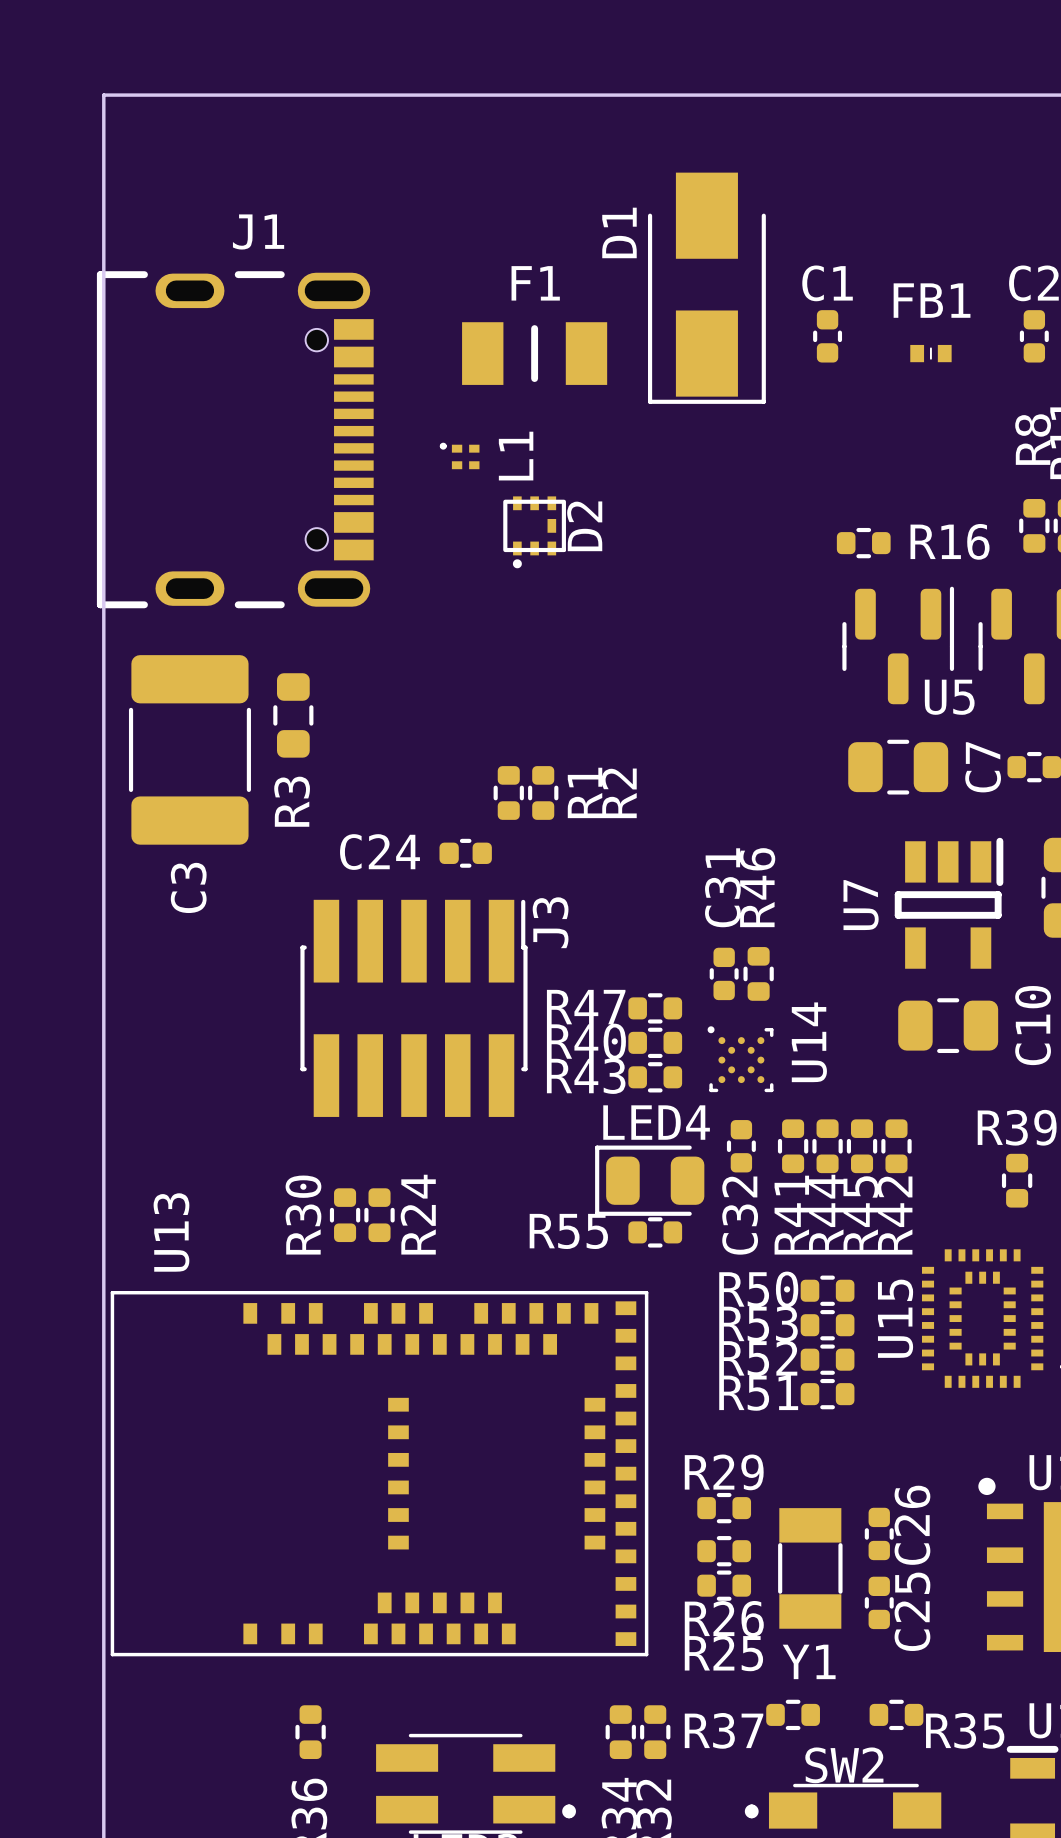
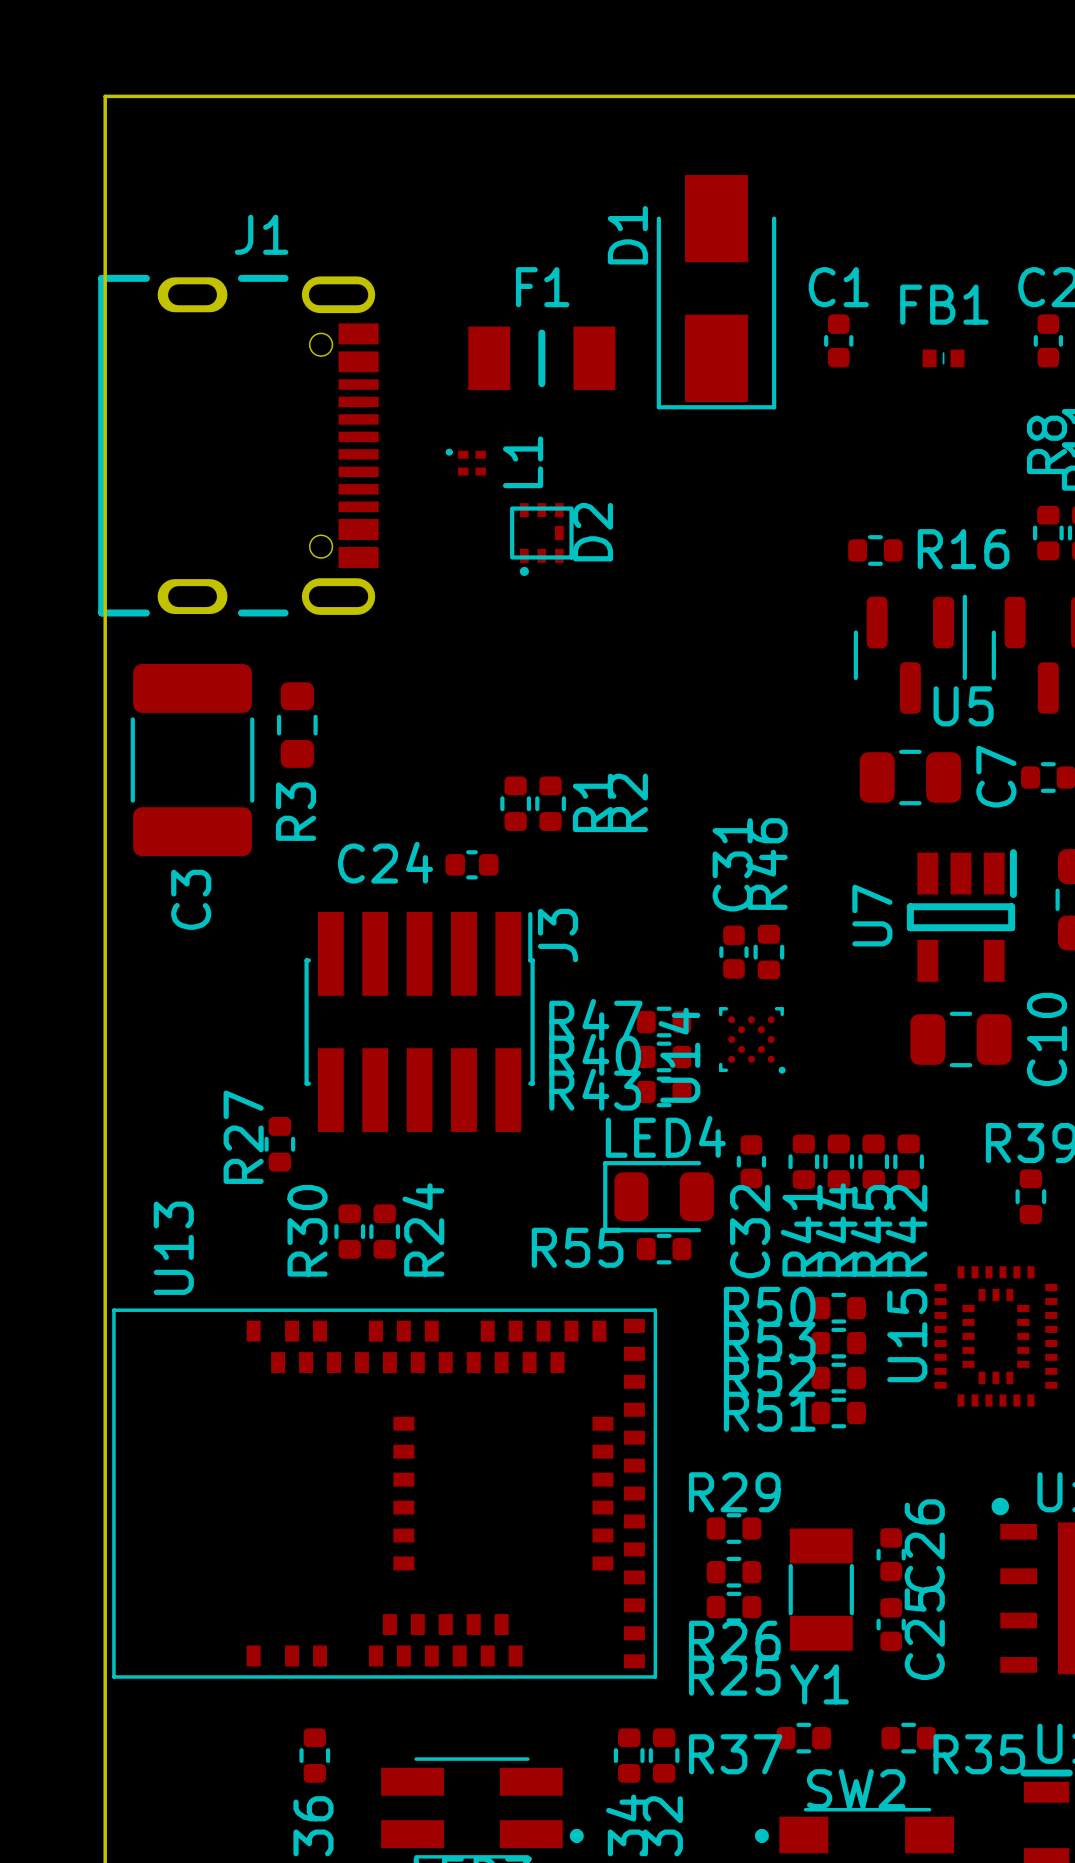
C31 position: (724, 973) -> (733, 952)
R46 position: (758, 973) -> (768, 952)
U14 rotation: 0° (740, 1059) -> 180° (752, 1040)
R27: none -> (279, 1144)

